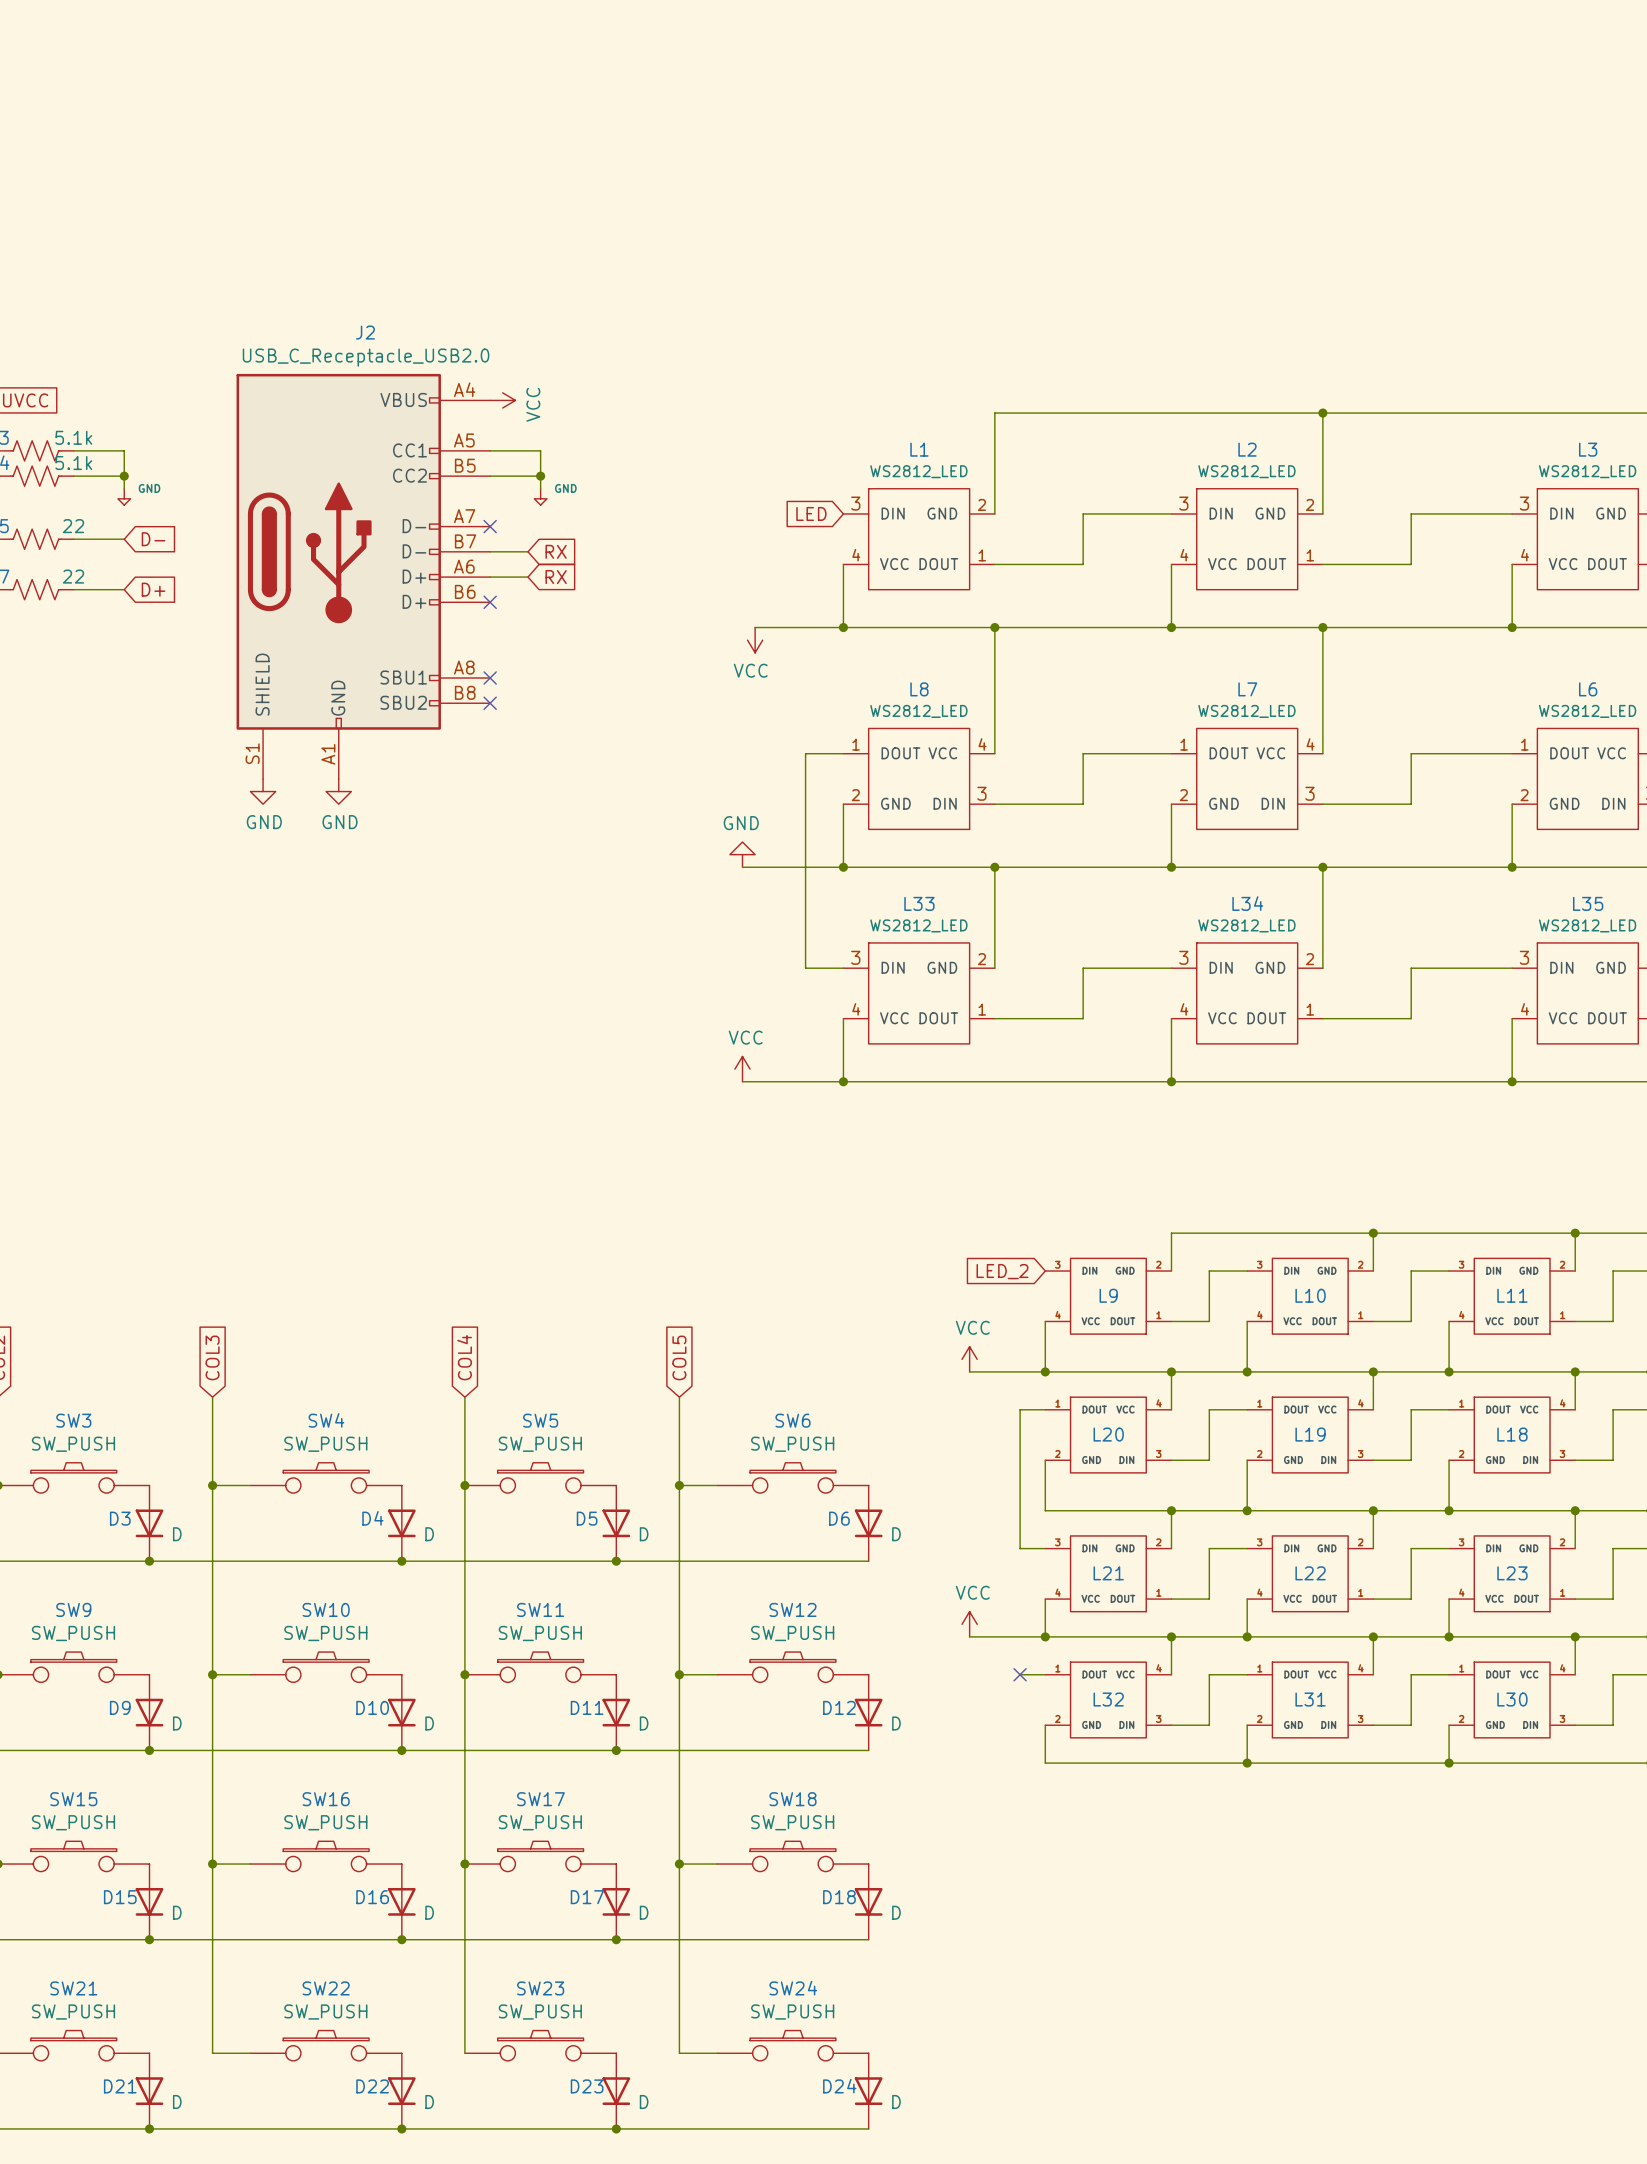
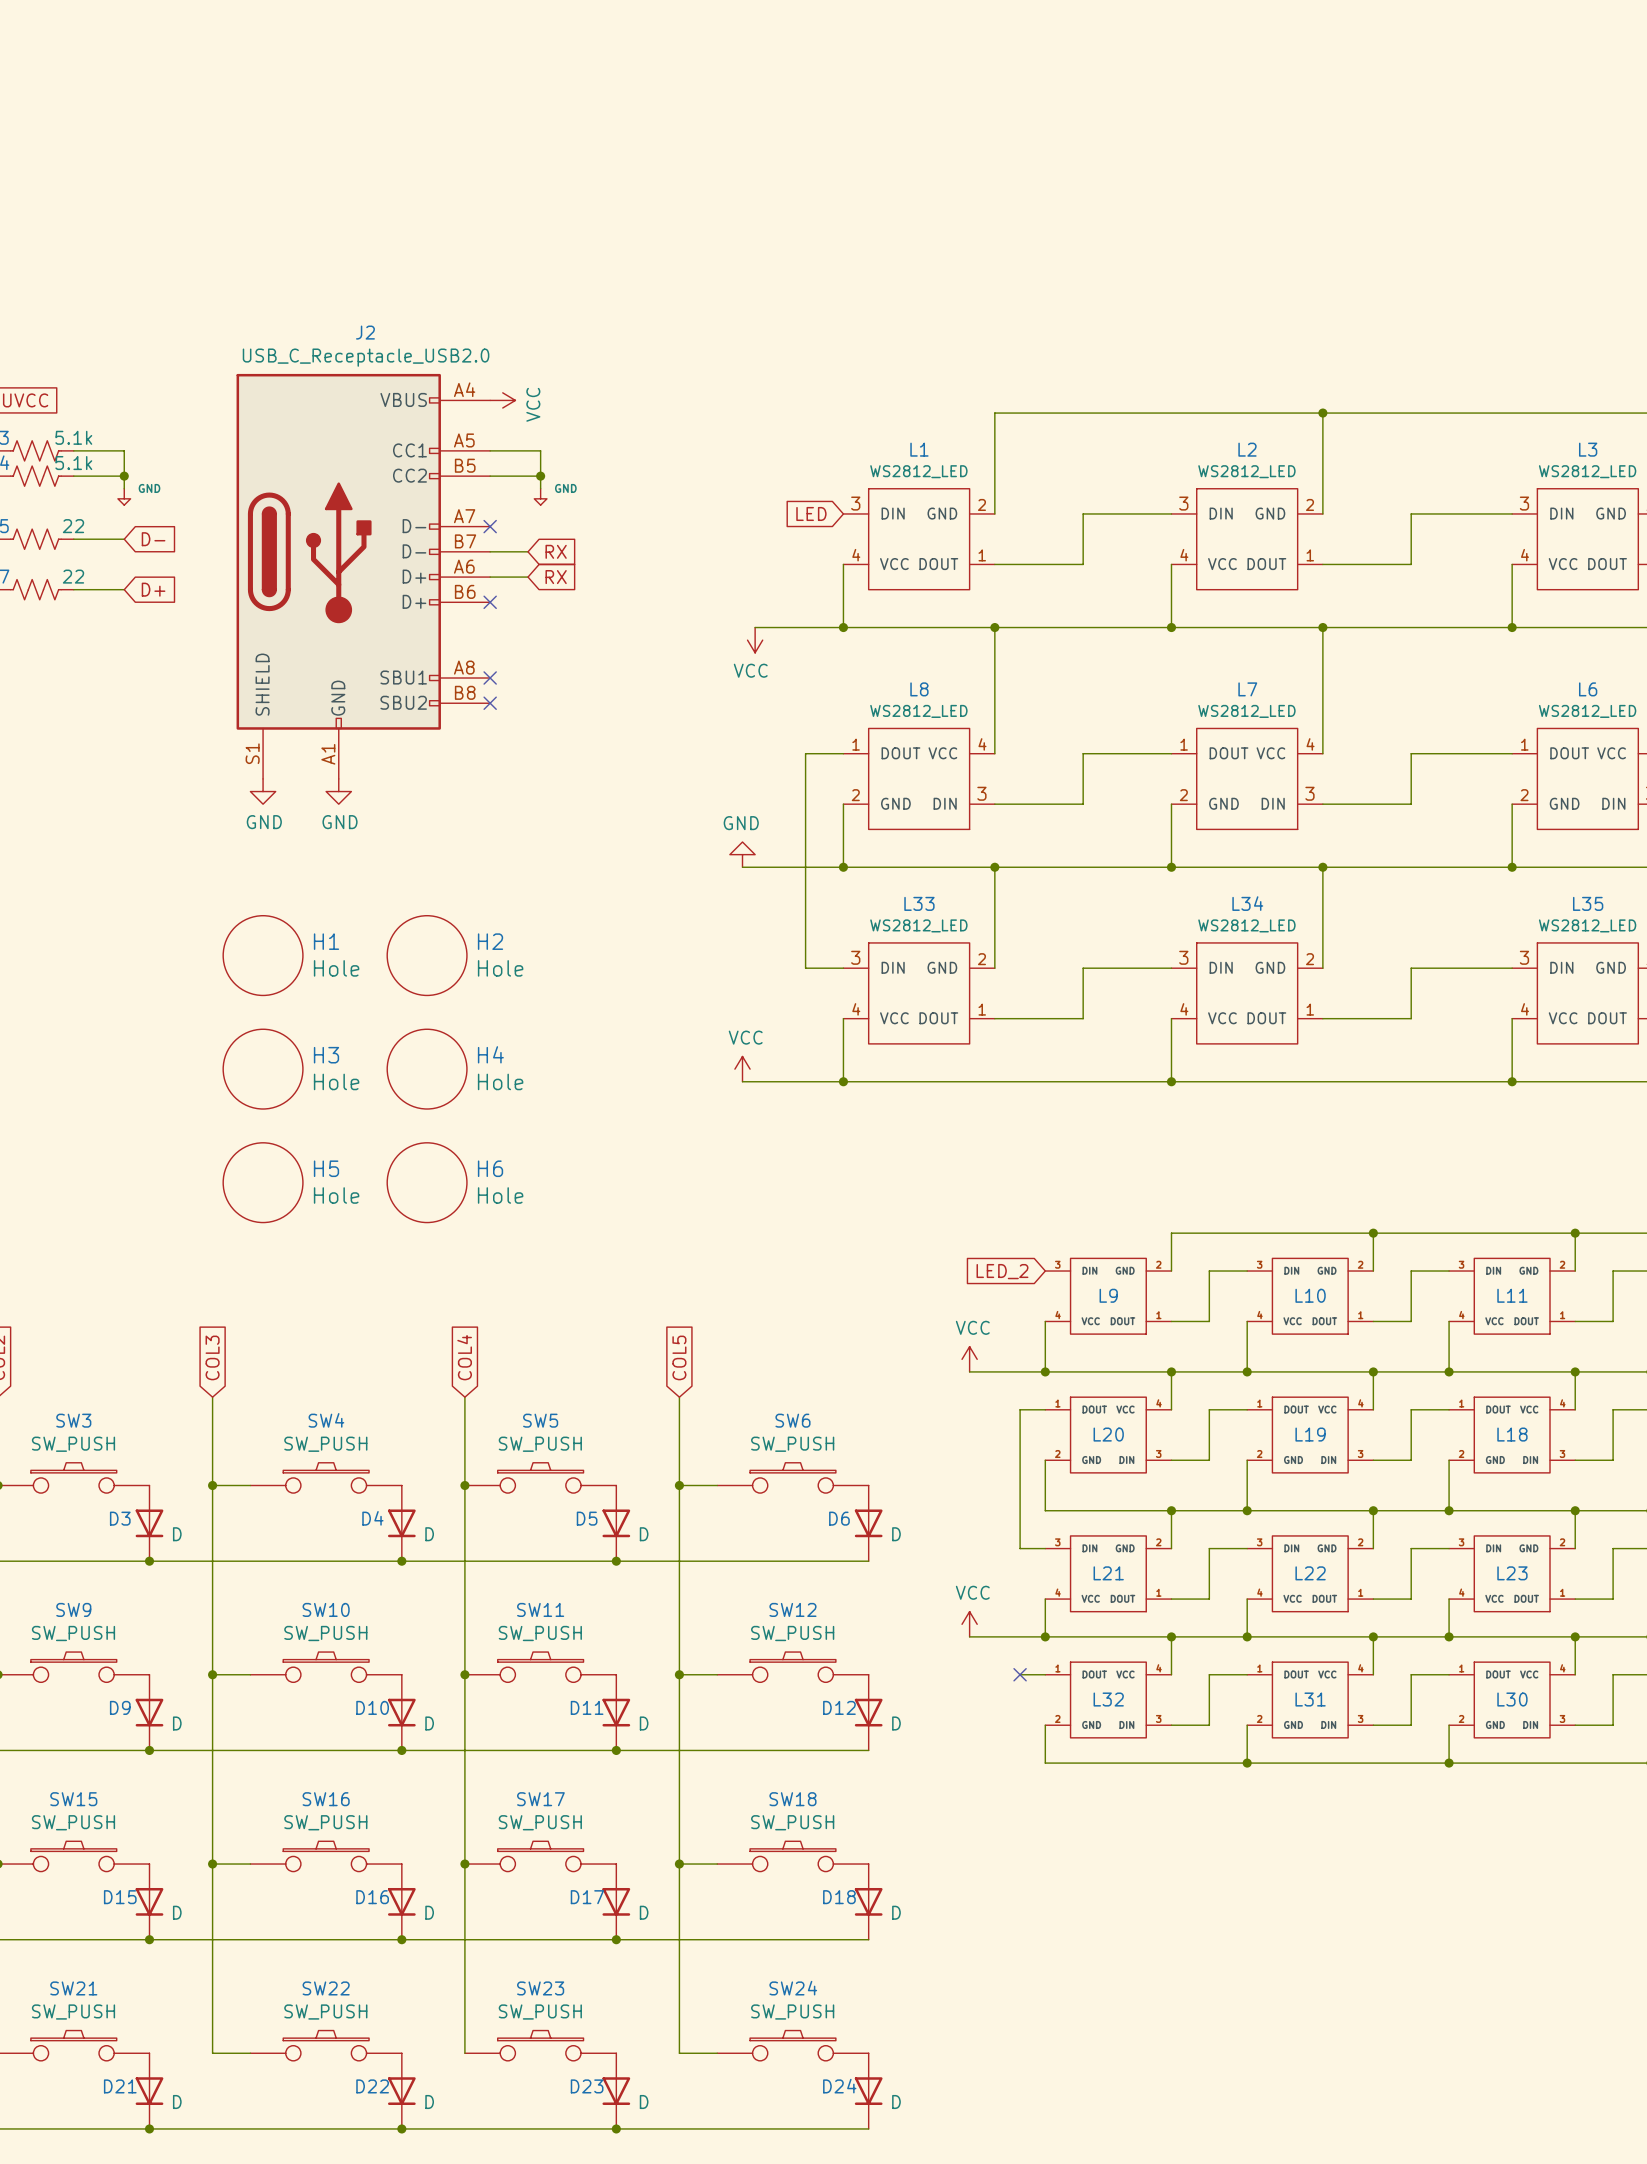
H1: none -> Hole (263, 955)
H2: none -> Hole (427, 955)
H3: none -> Hole (263, 1069)
H4: none -> Hole (427, 1069)
H5: none -> Hole (263, 1182)
H6: none -> Hole (427, 1182)

